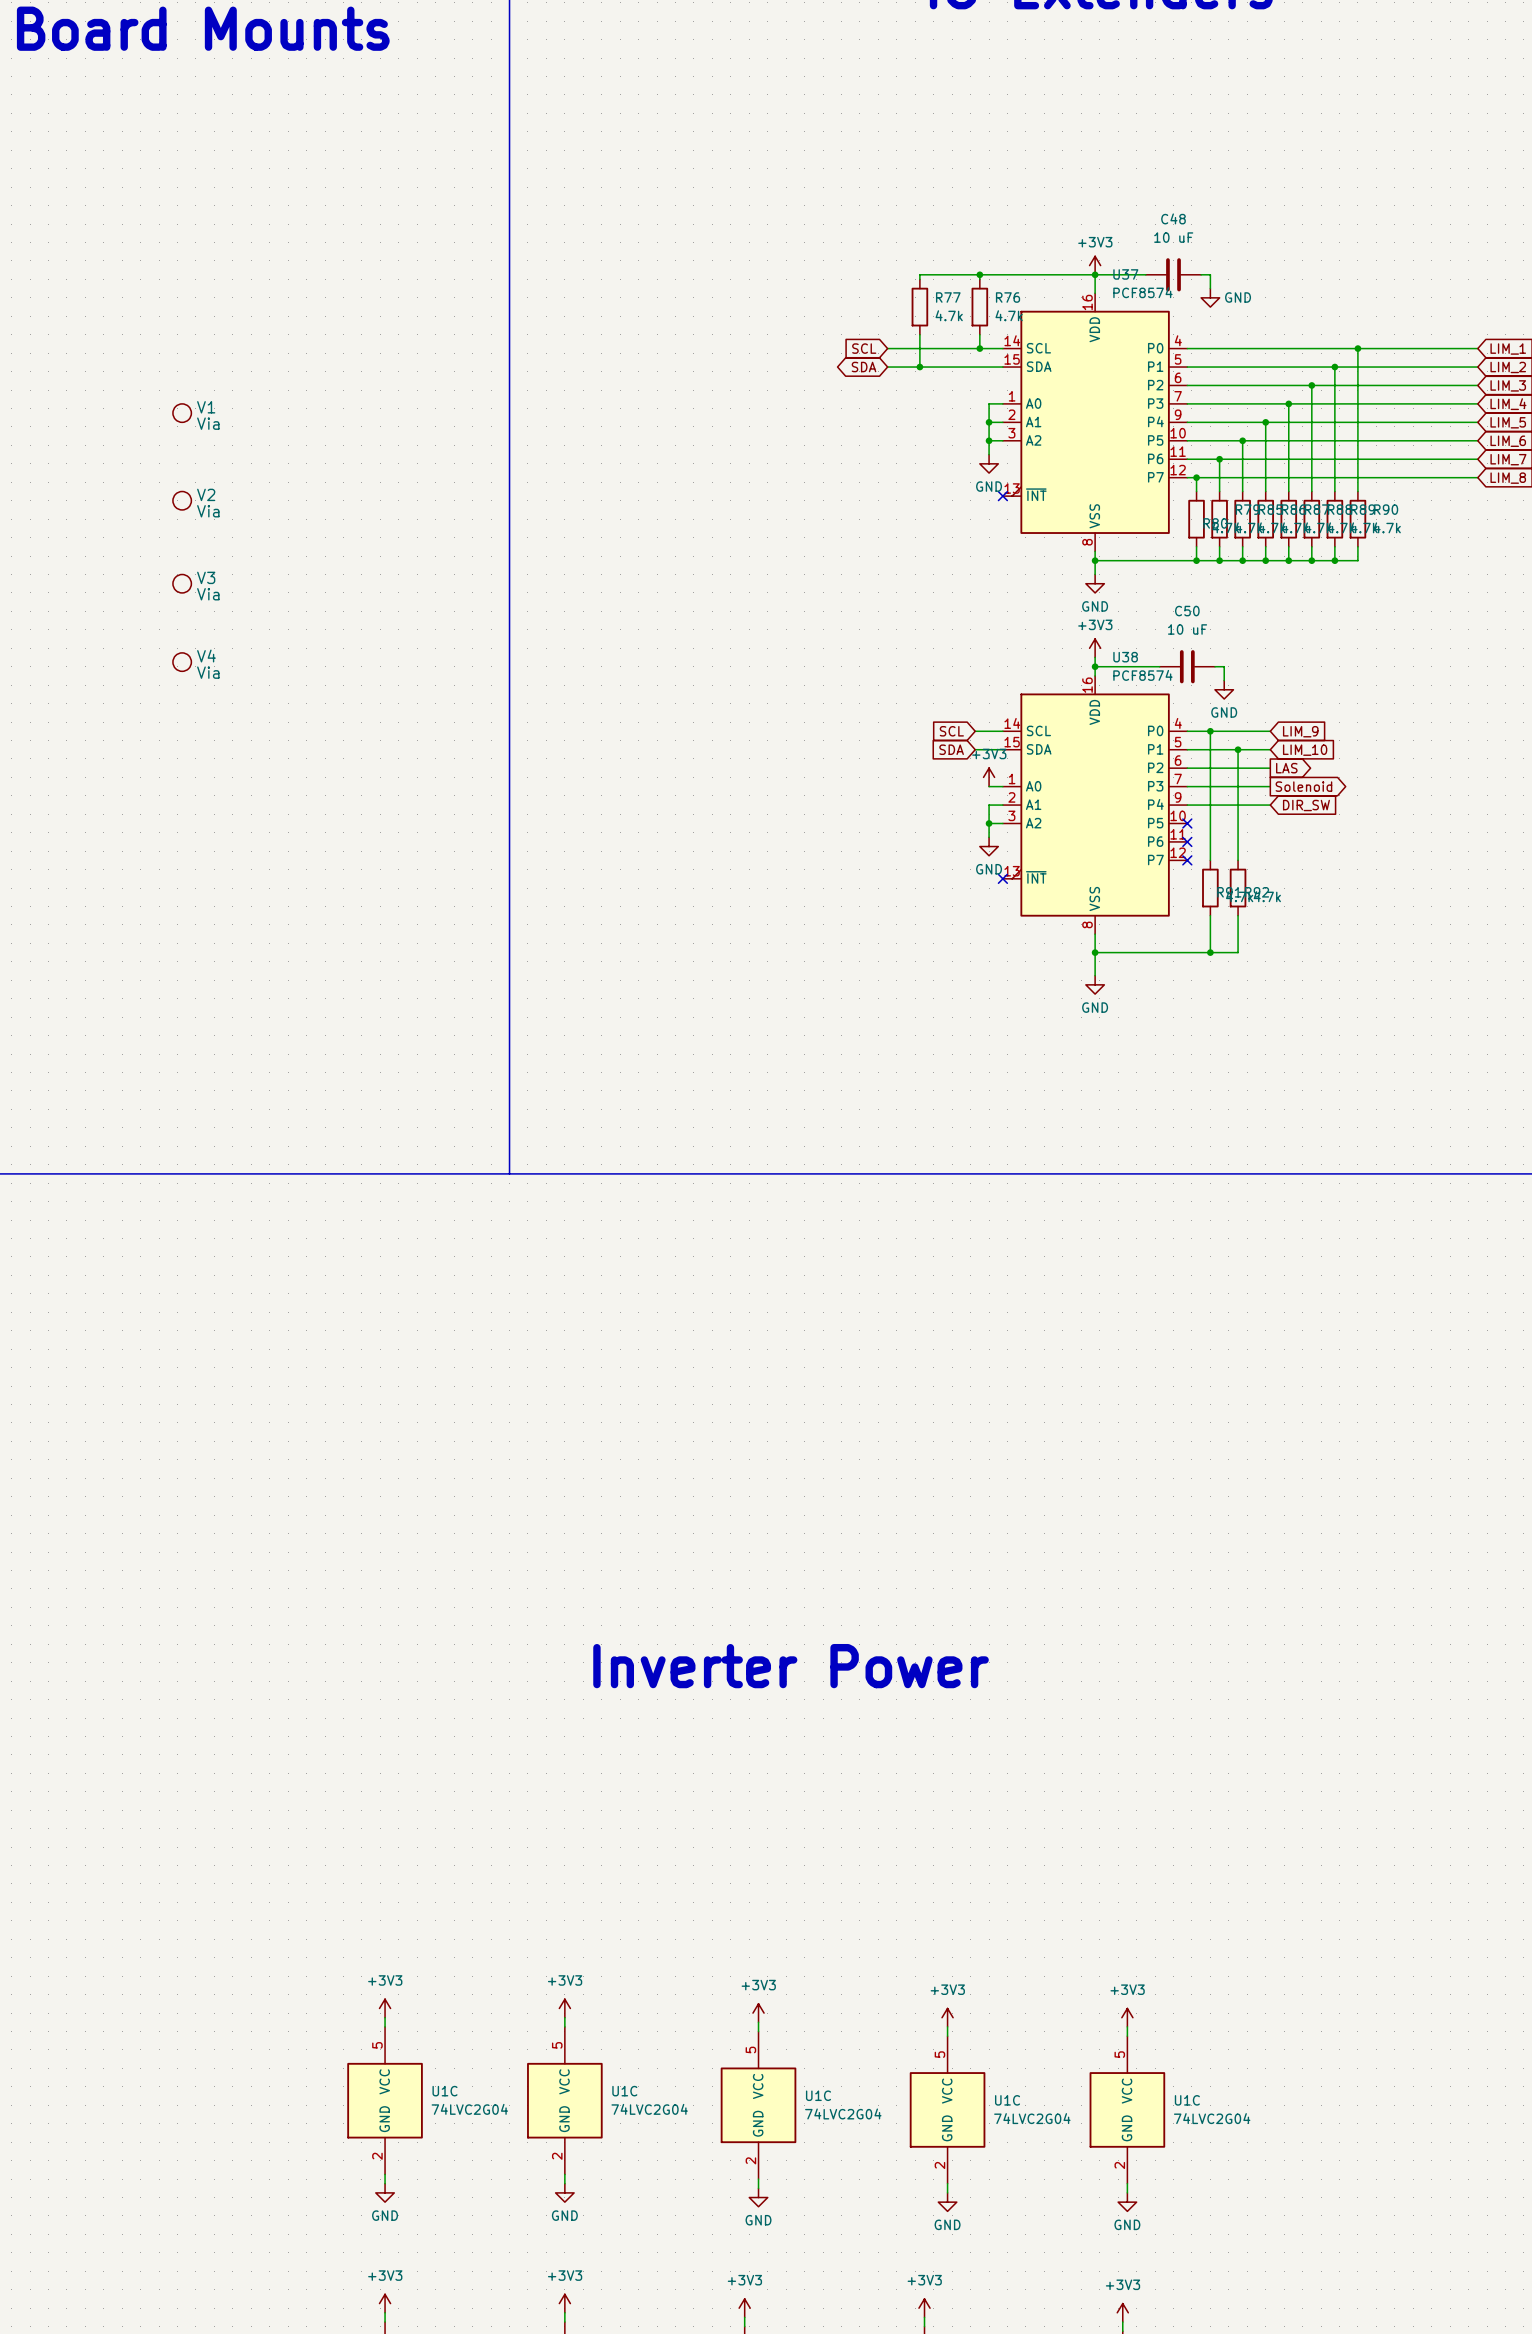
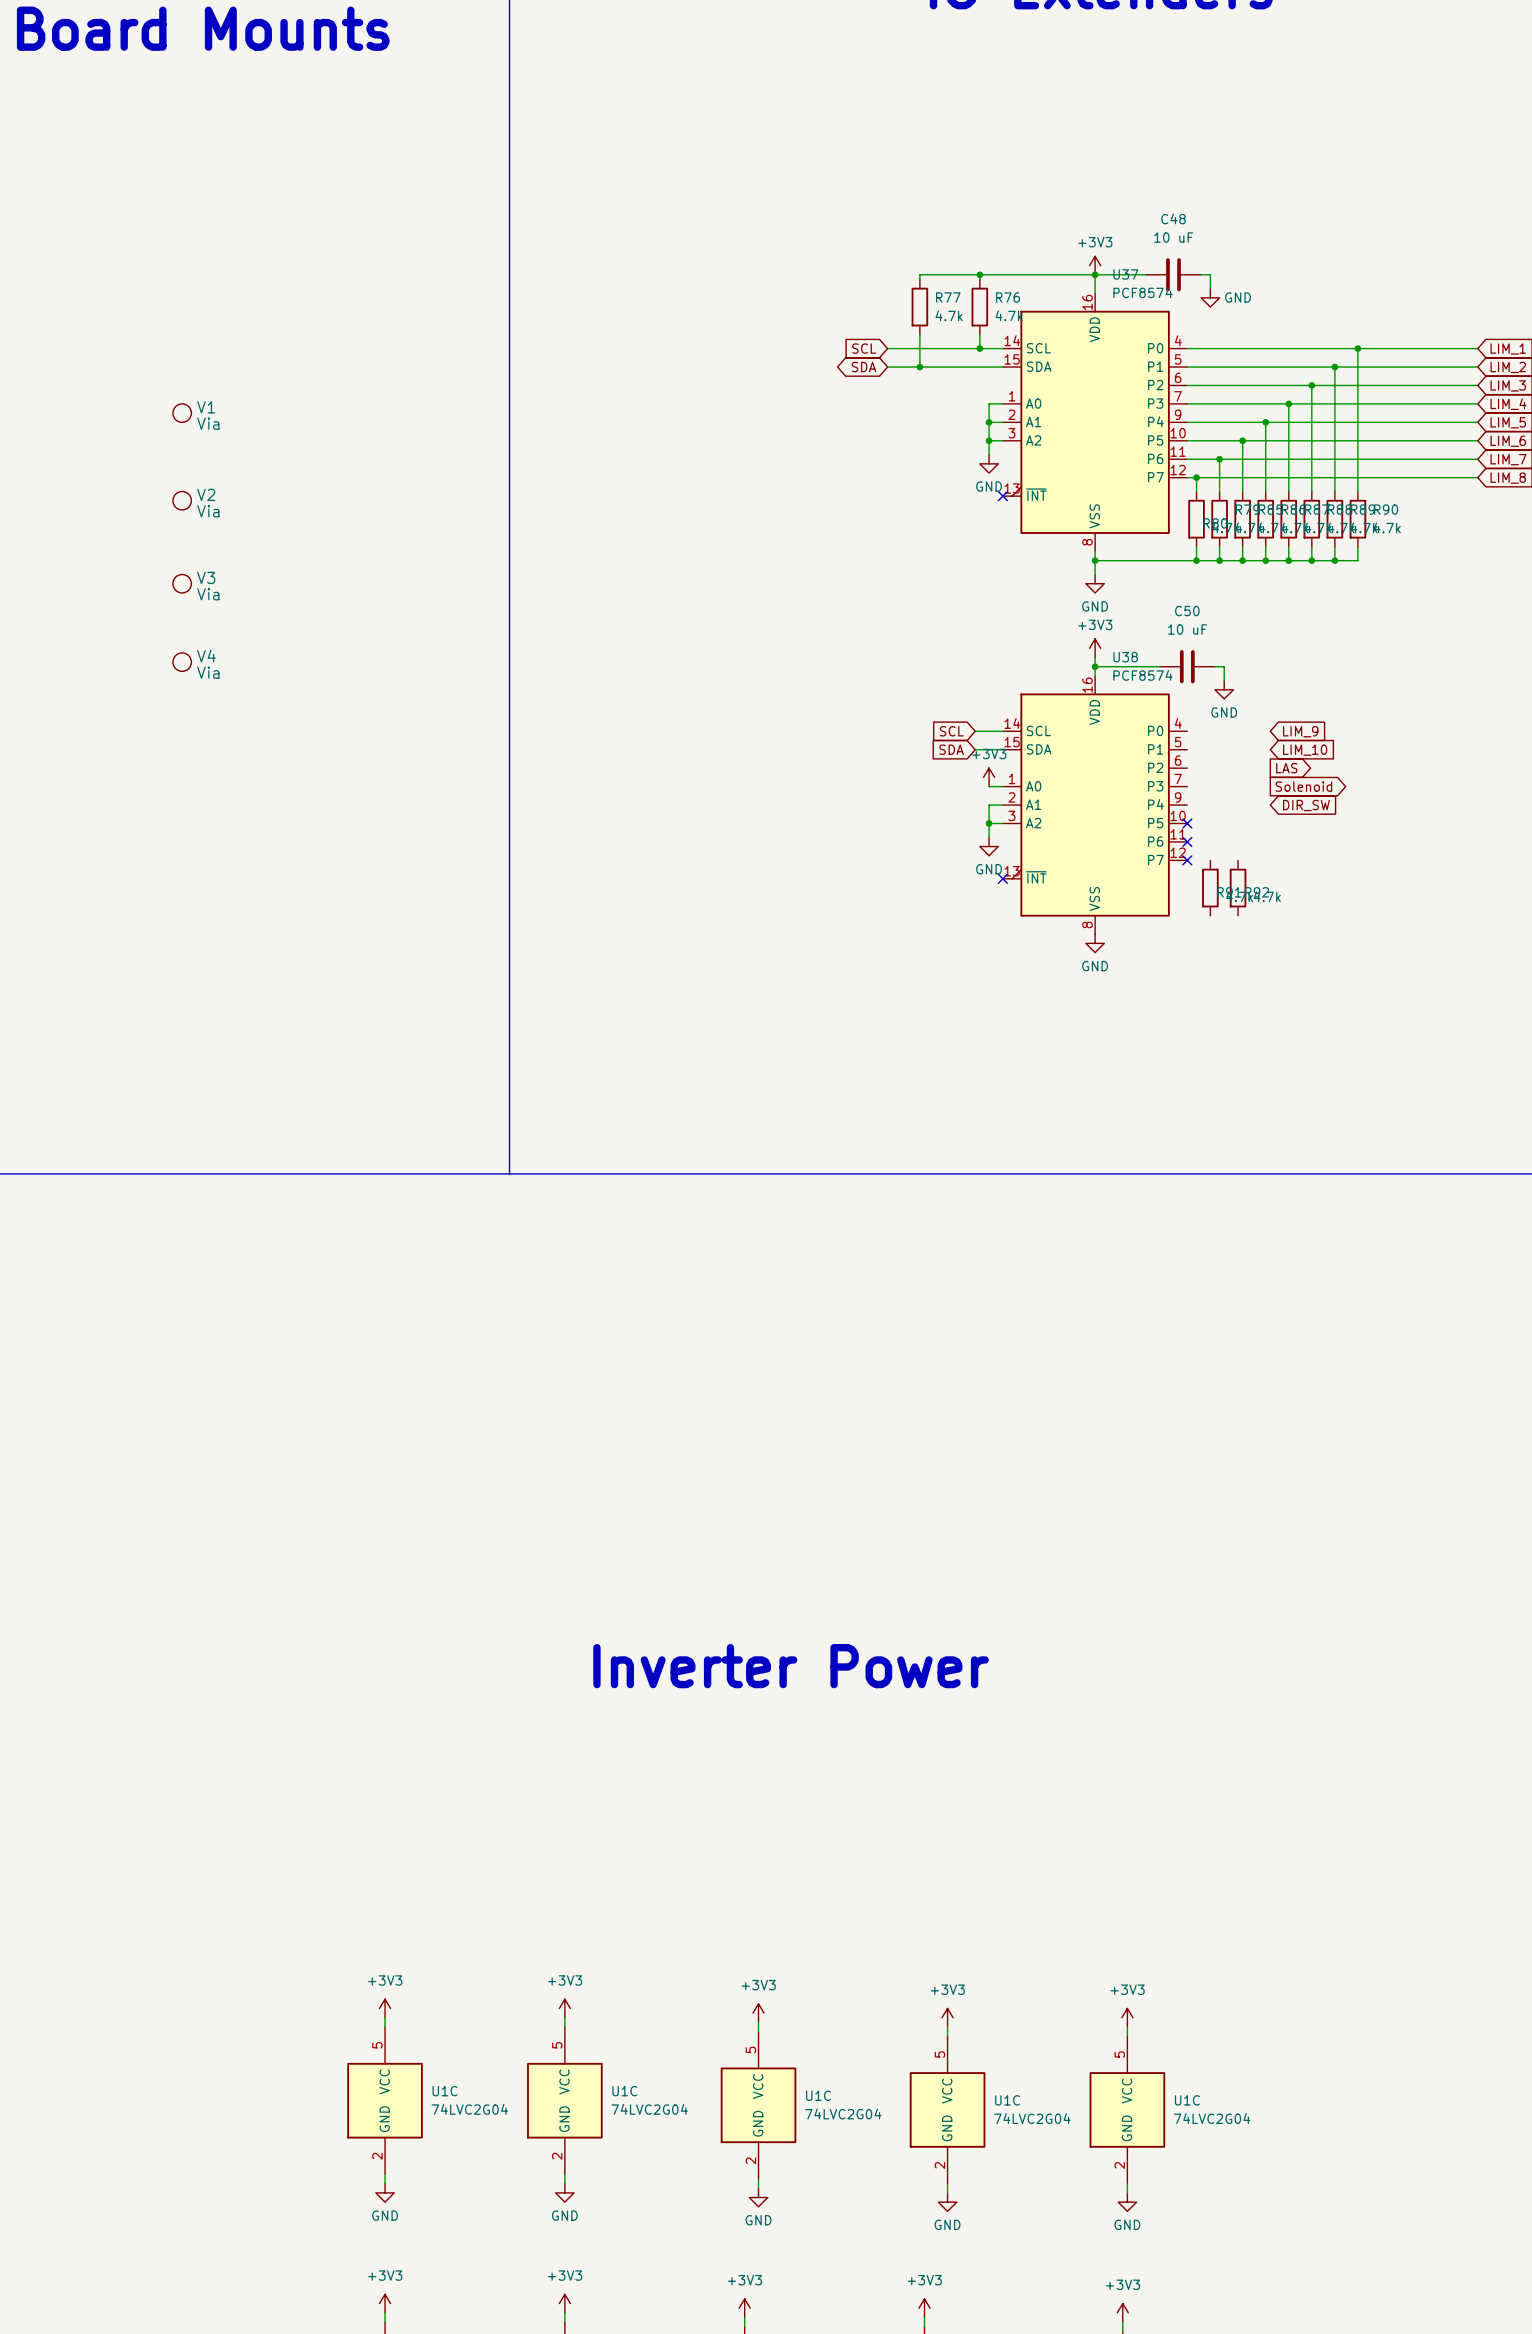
wire: (1187, 731) (1270, 731) -> none
wire: (1210, 731) (1210, 860) -> none
junction: (1210, 731) -> none
wire: (1187, 749) (1270, 749) -> none
wire: (1238, 749) (1238, 860) -> none
junction: (1238, 749) -> none
wire: (1187, 768) (1270, 768) -> none
wire: (1187, 786) (1270, 786) -> none
wire: (1187, 805) (1270, 805) -> none
wire: (1210, 915) (1210, 952) -> none
wire: (1238, 915) (1238, 952) (1095, 952) -> none
wire: (1095, 934) (1095, 975) -> none
junction: (1095, 952) -> none
junction: (1210, 952) -> none
power symbol position: GND (1095, 984) -> GND (1095, 943)

